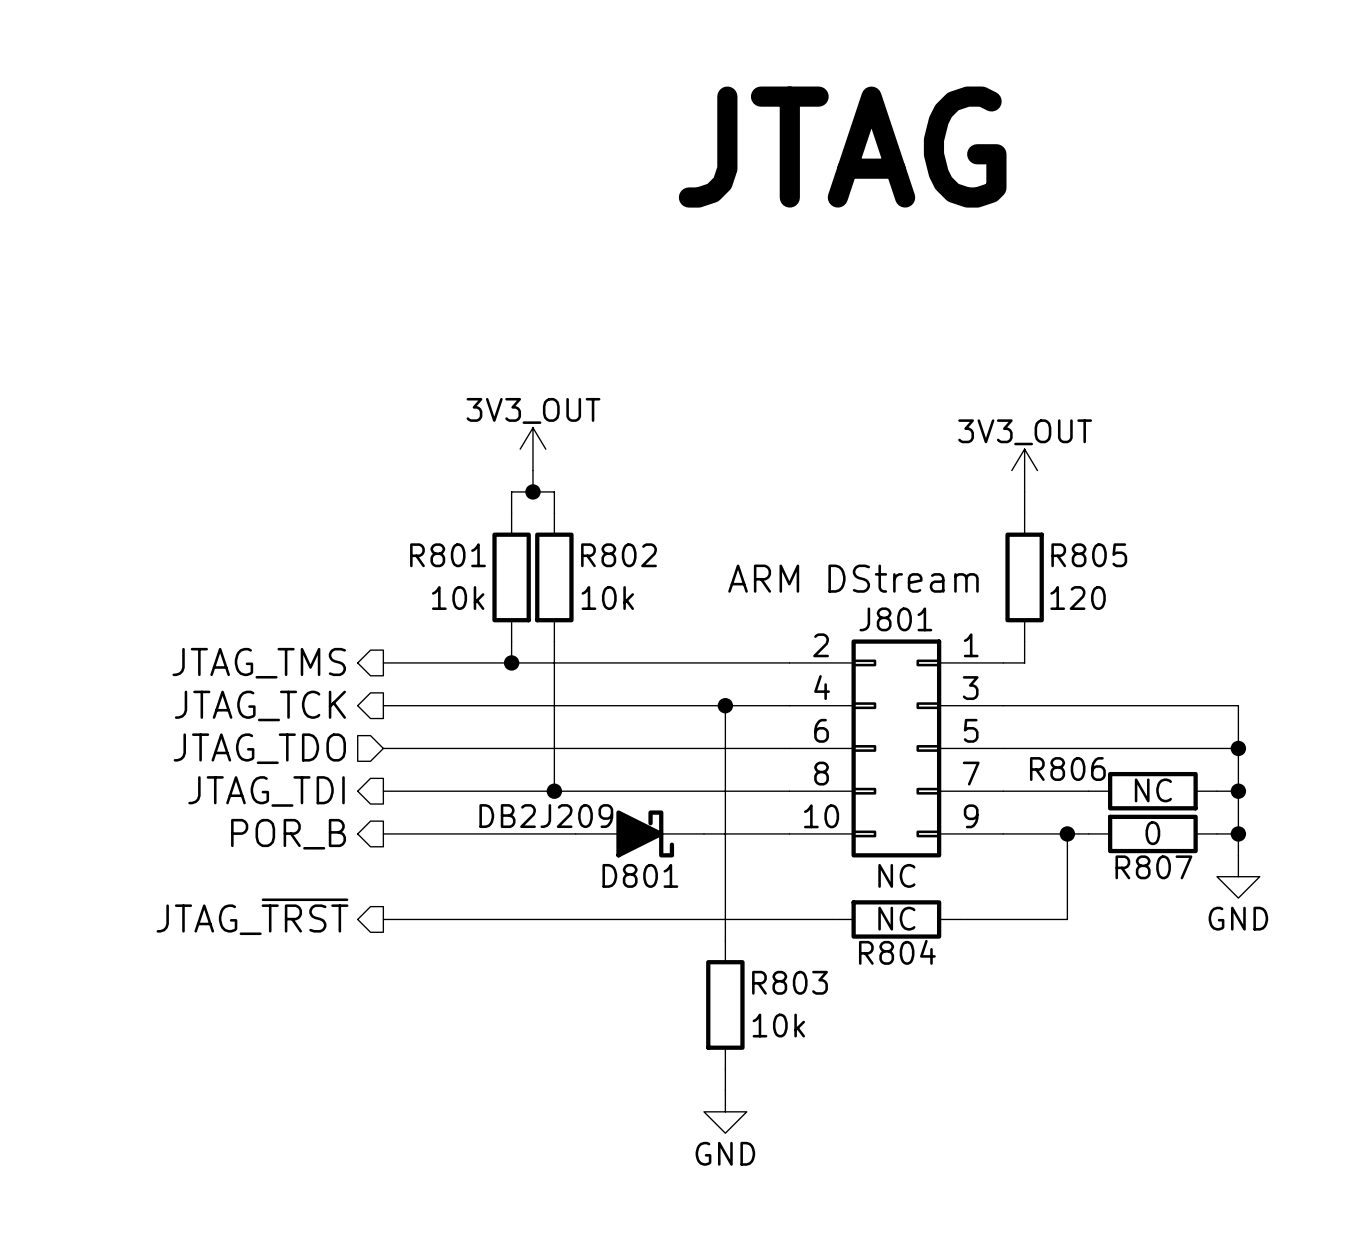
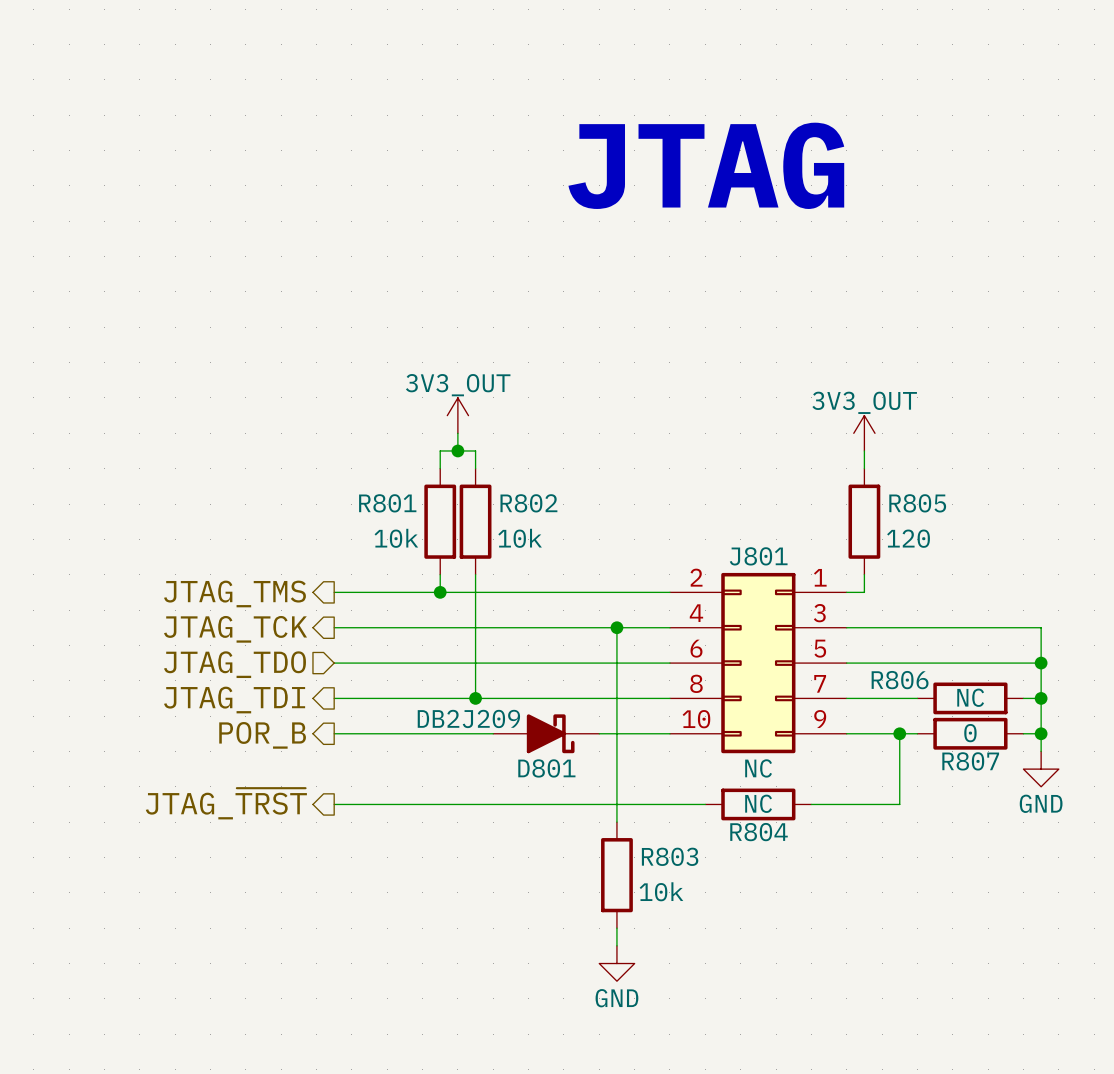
text: ARM DStream (853, 578) -> none

